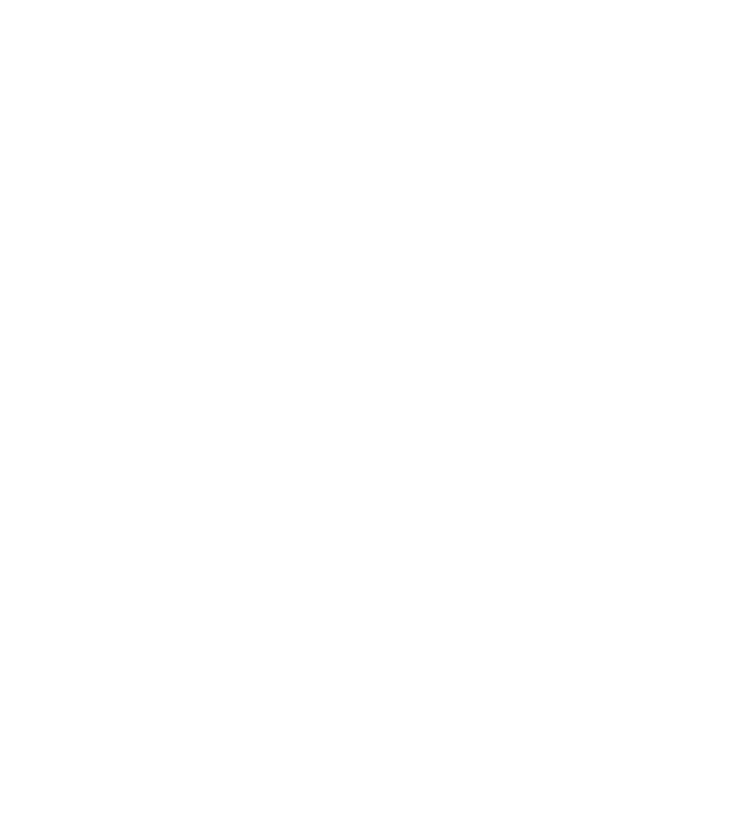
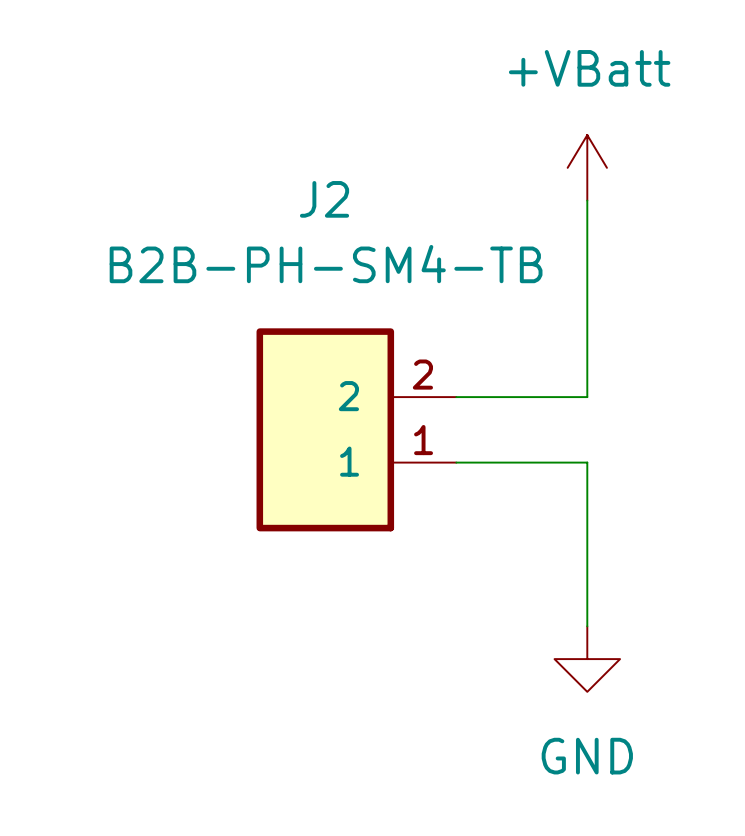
power symbol: none -> +VBatt (587, 167)
wire: none -> (587, 200) (587, 397) (456, 397)
J2: none -> B2B-PH-SM4-TB (356, 429)
wire: none -> (456, 462) (587, 462) (587, 626)
power symbol: none -> GND (587, 659)

